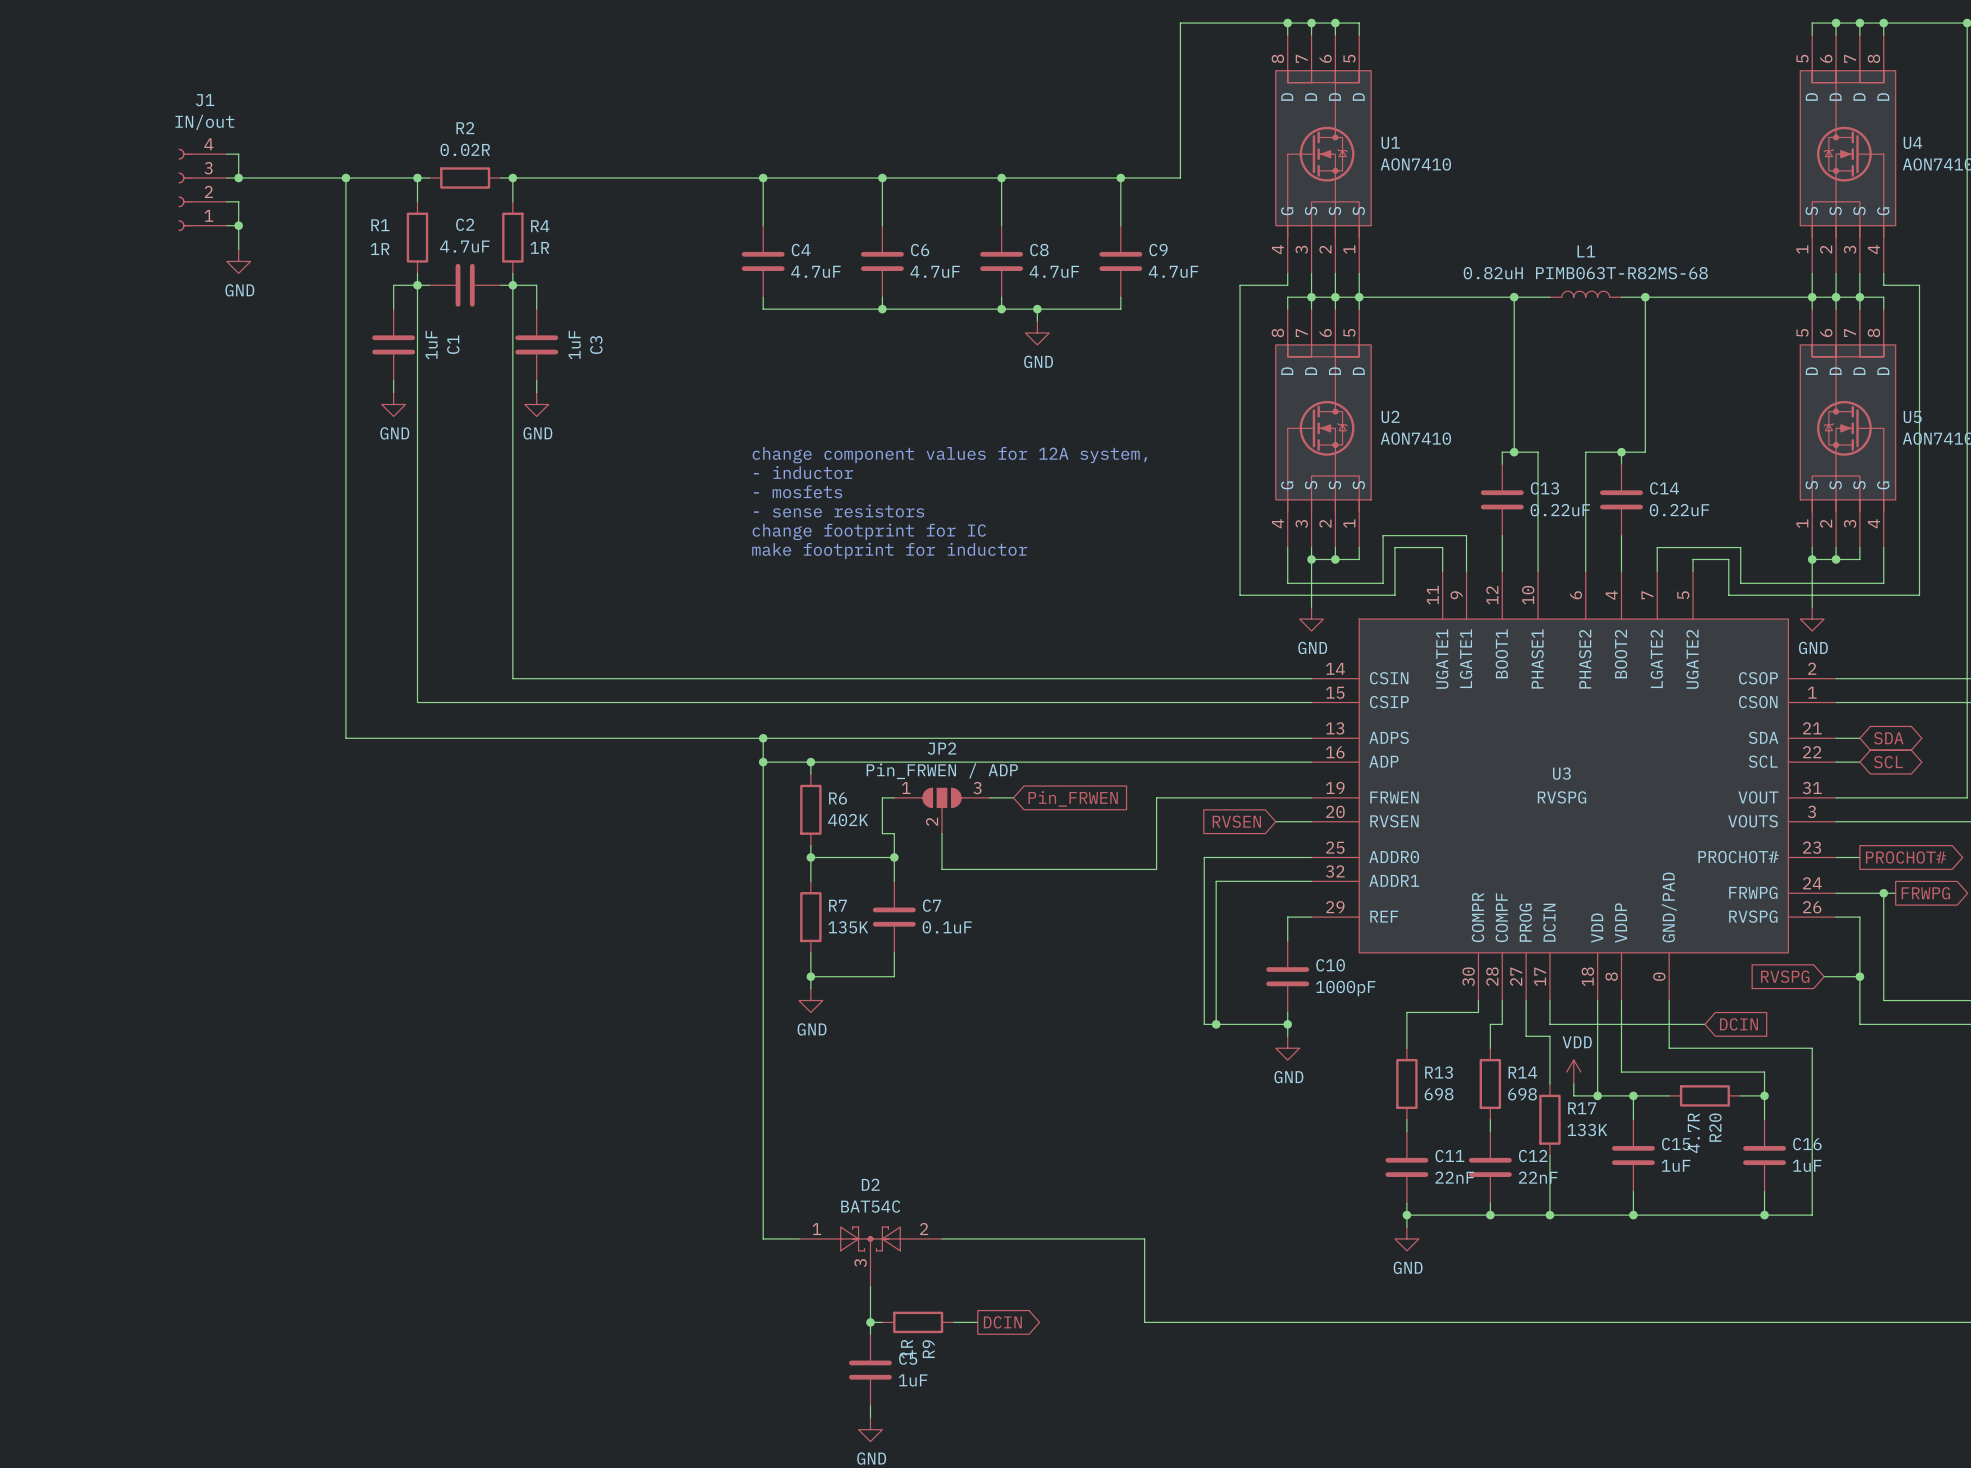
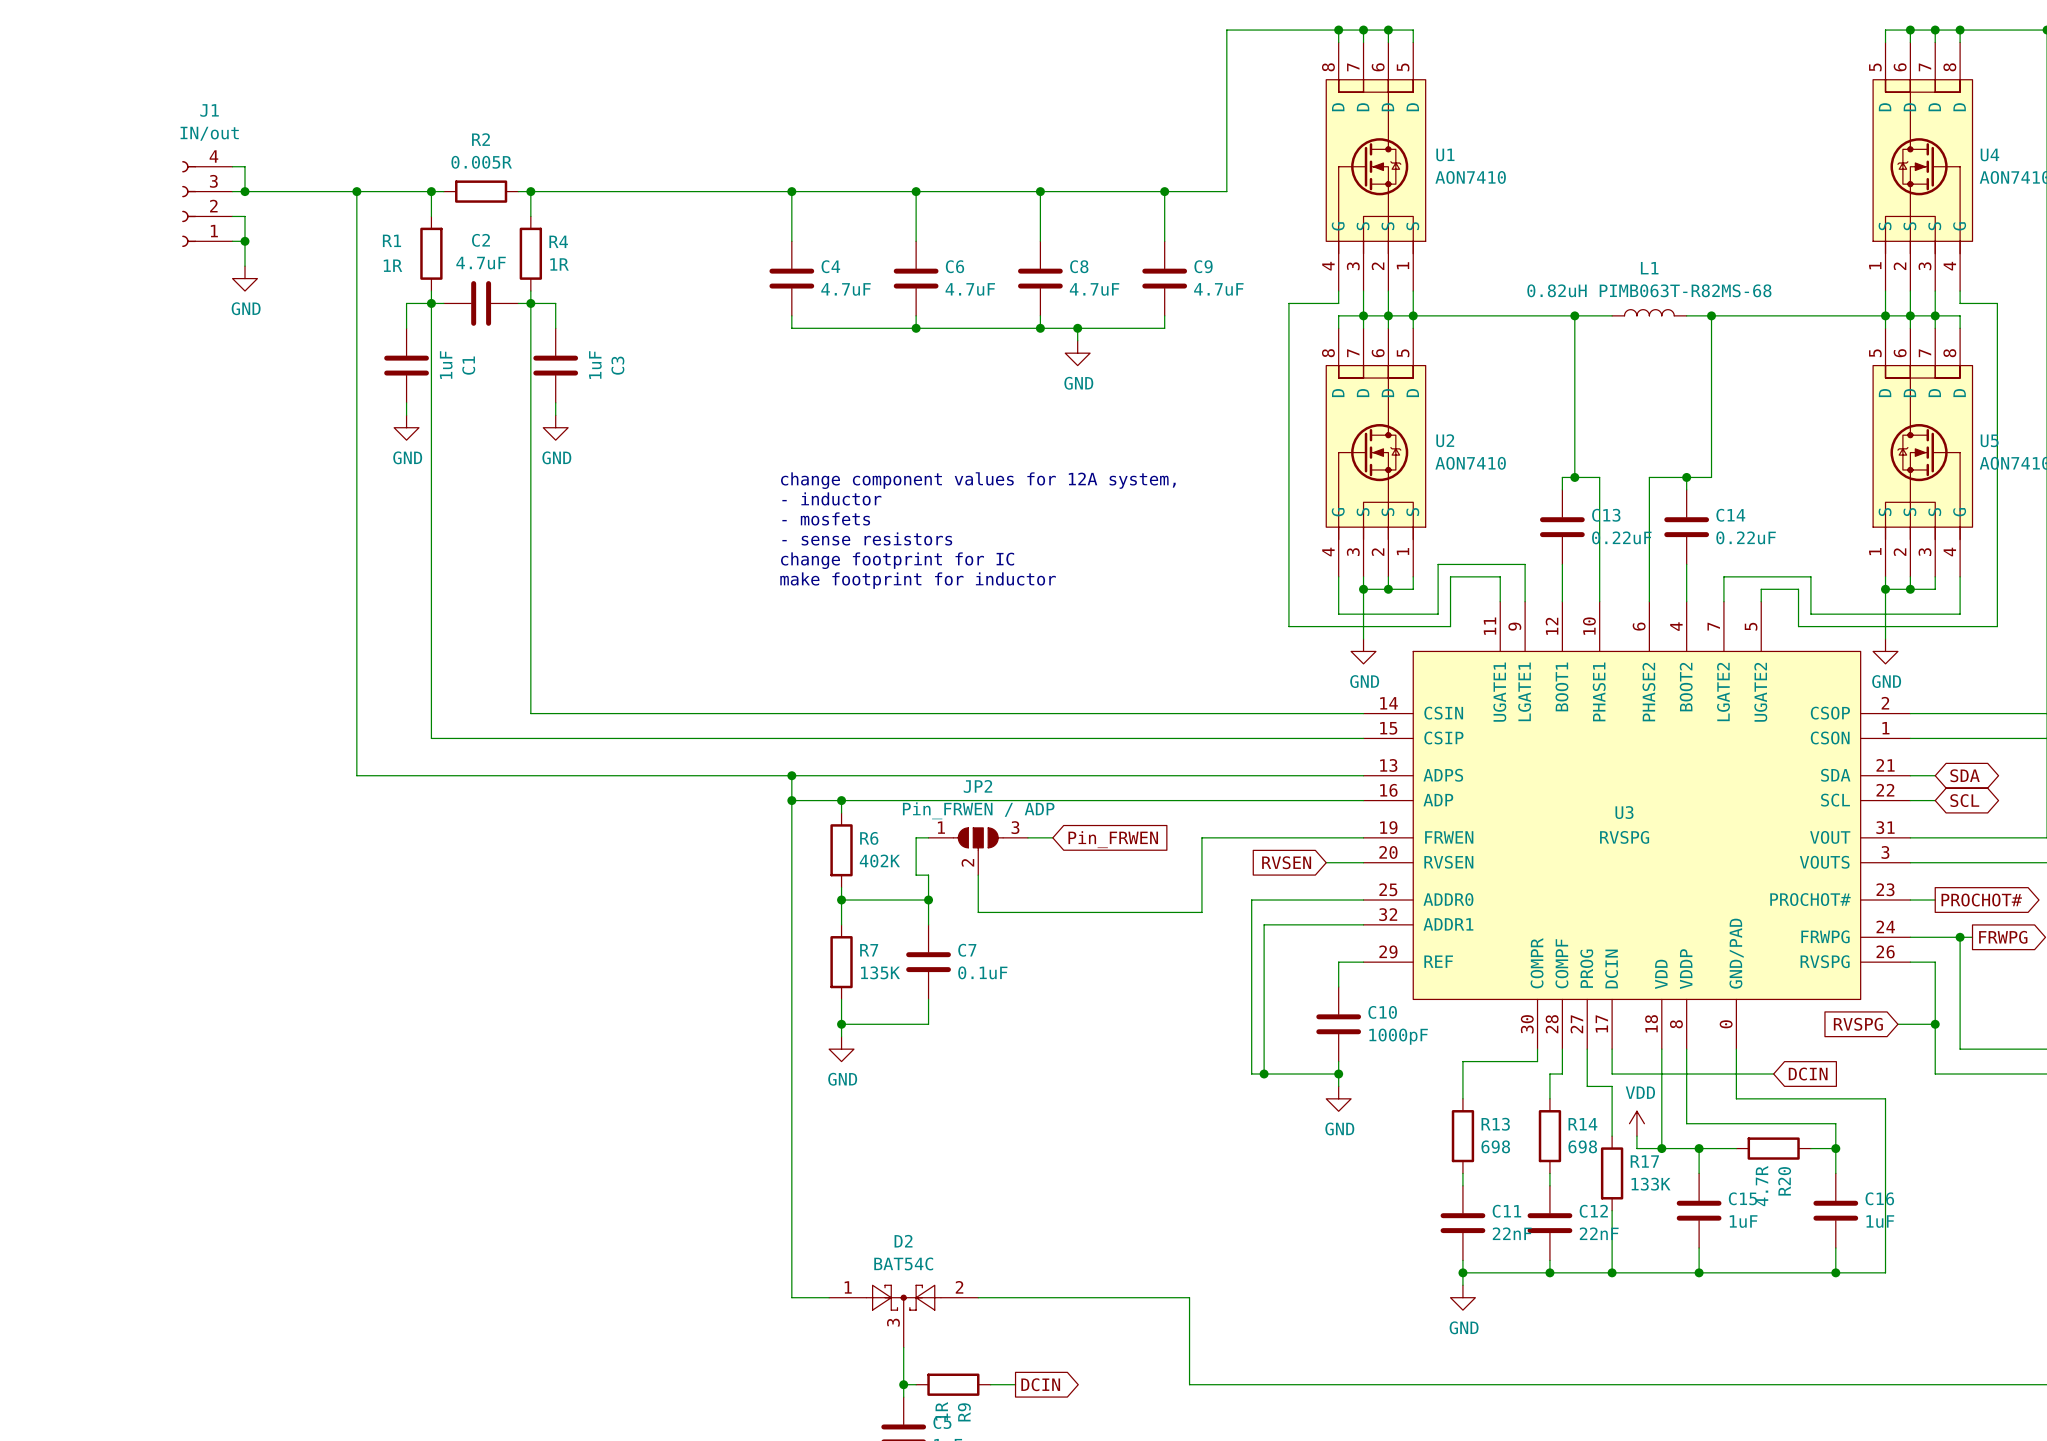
R2 value: 0.02R (465, 149) -> 0.005R (481, 162)

